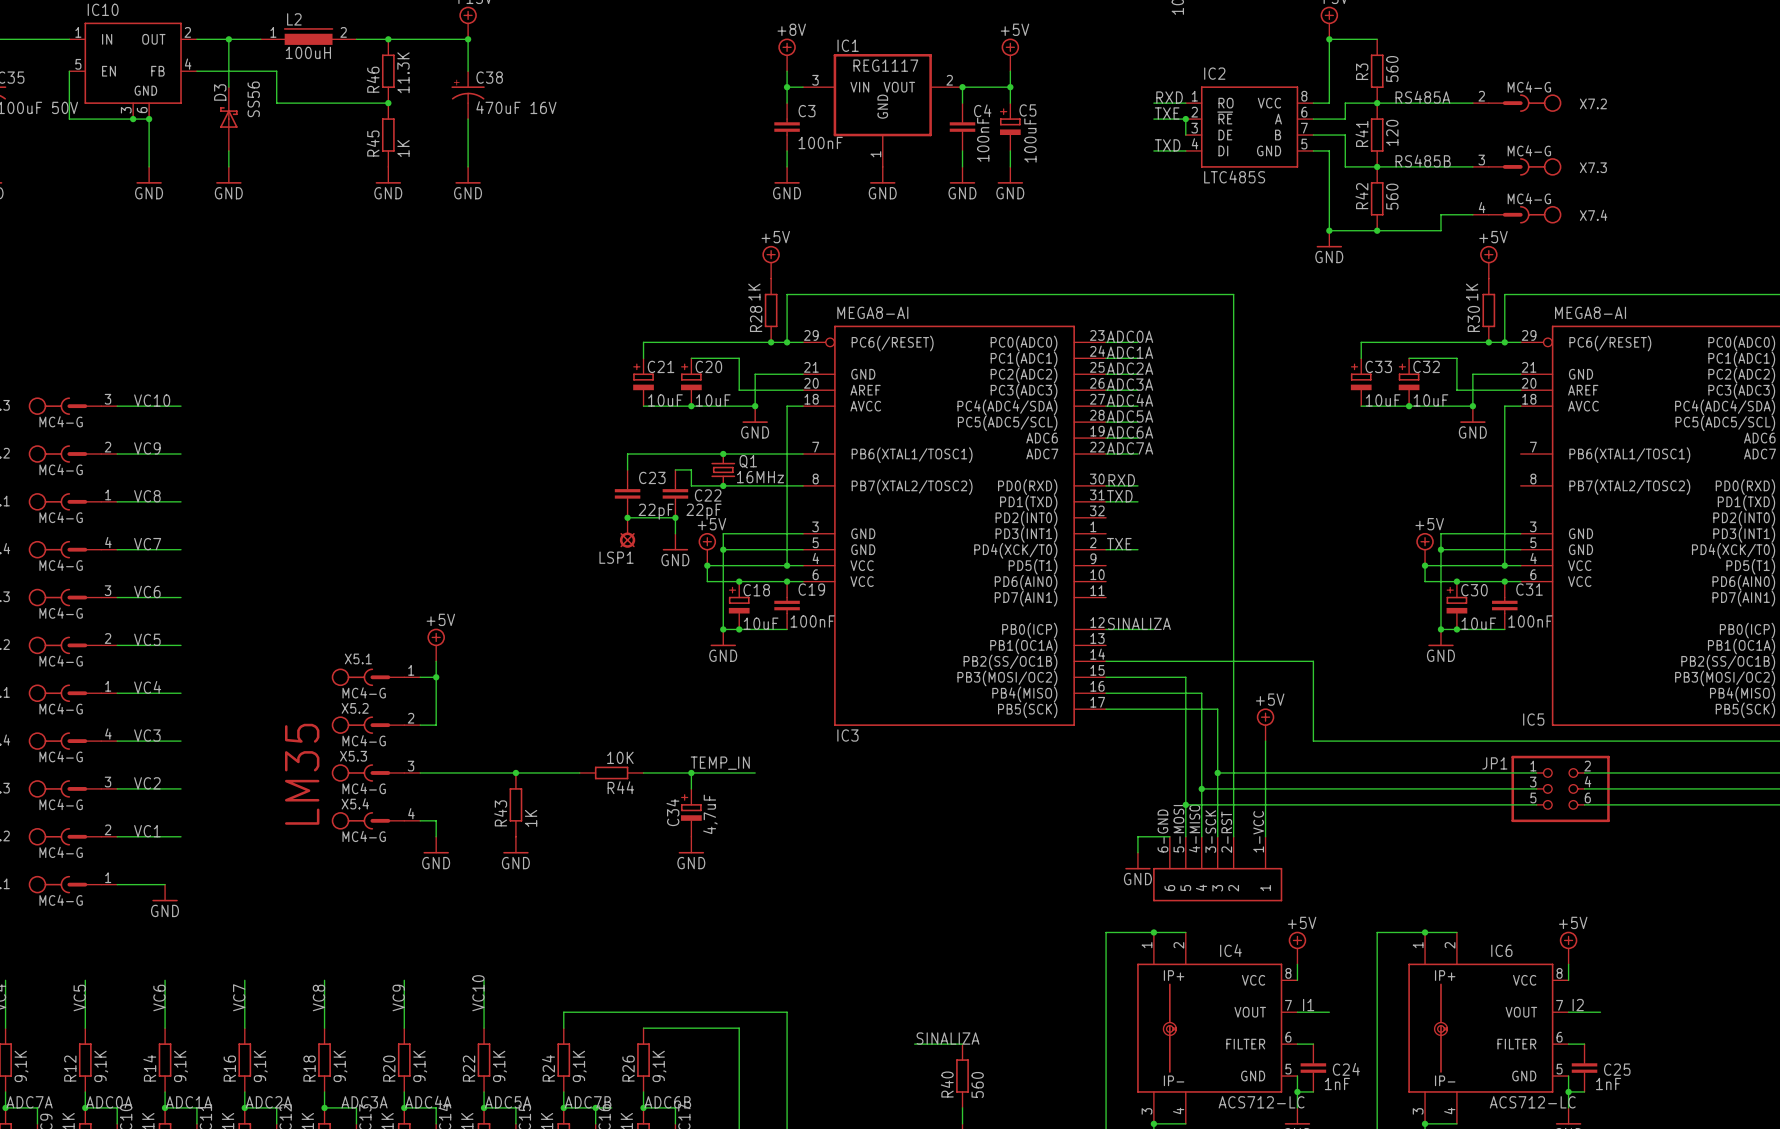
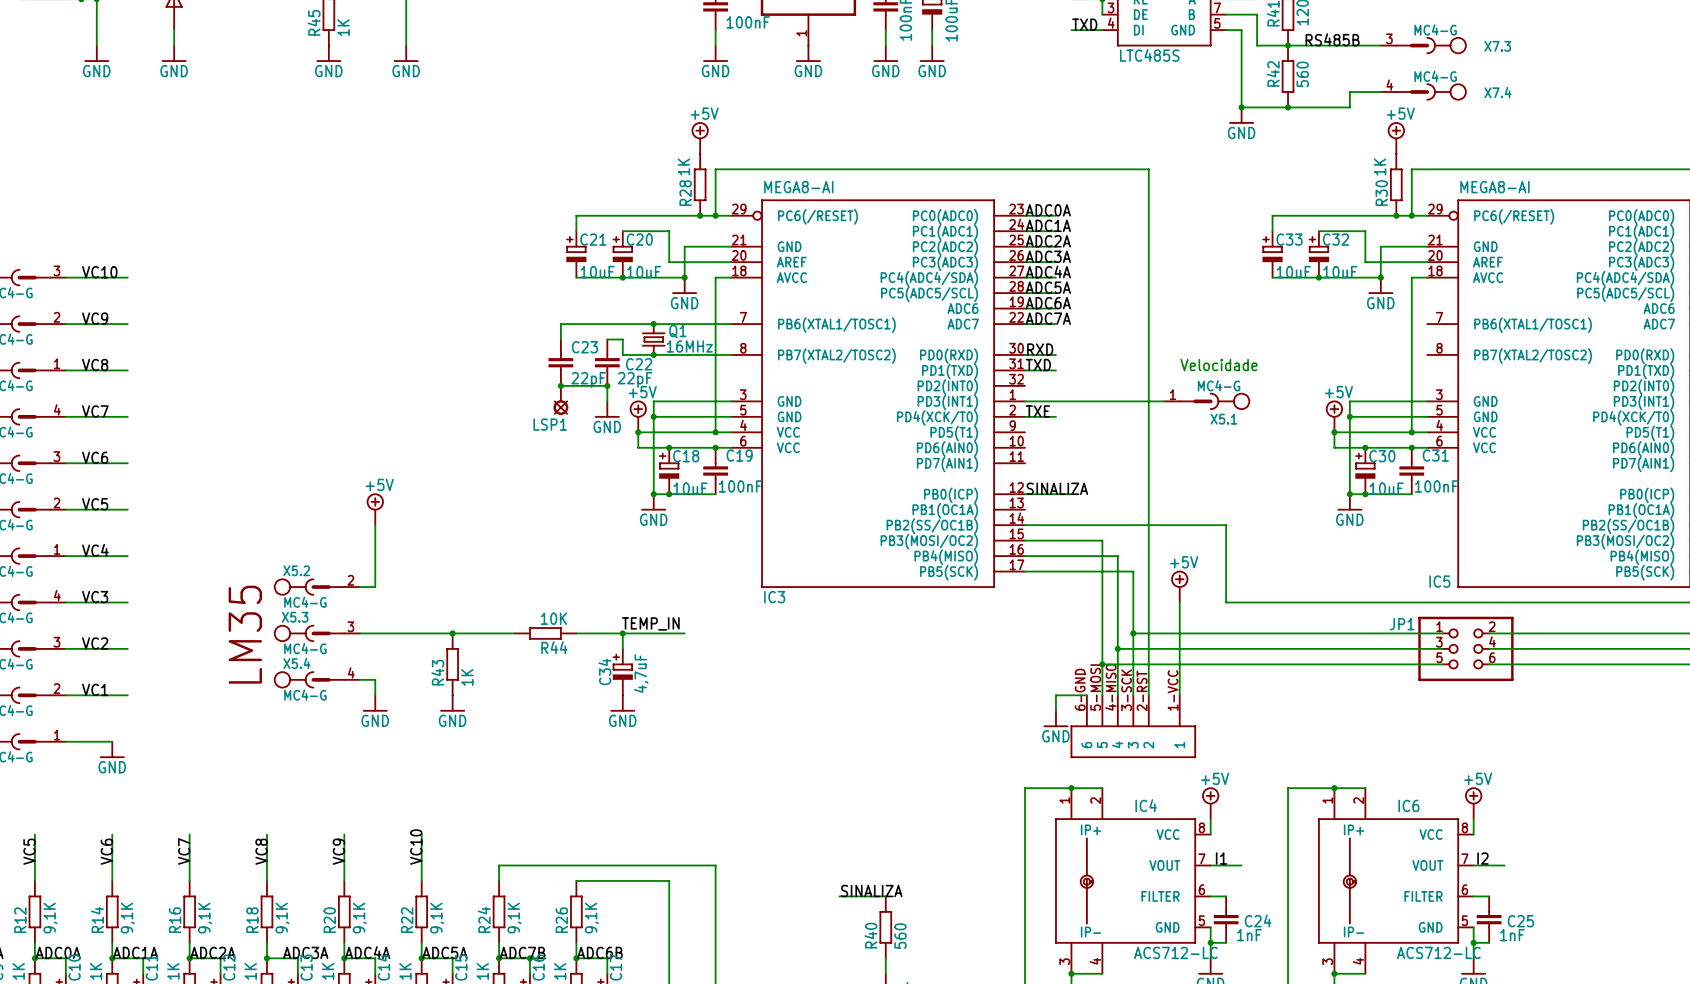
text: none -> Velocidade (1219, 365)
wire: none -> (1025, 401) (1164, 401)
X5.1 rotation: 0° (368, 677) -> 180° (1214, 401)
X5.1 position: (375, 677) -> (1207, 401)
wire: (420, 677) (436, 677) -> none
junction: (436, 677) -> none

